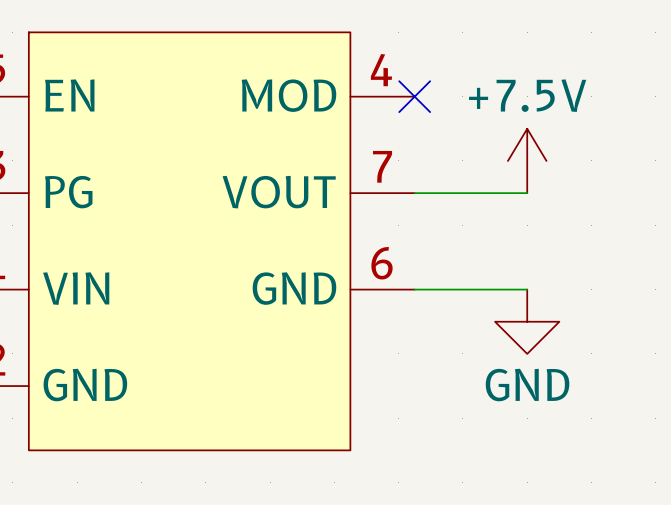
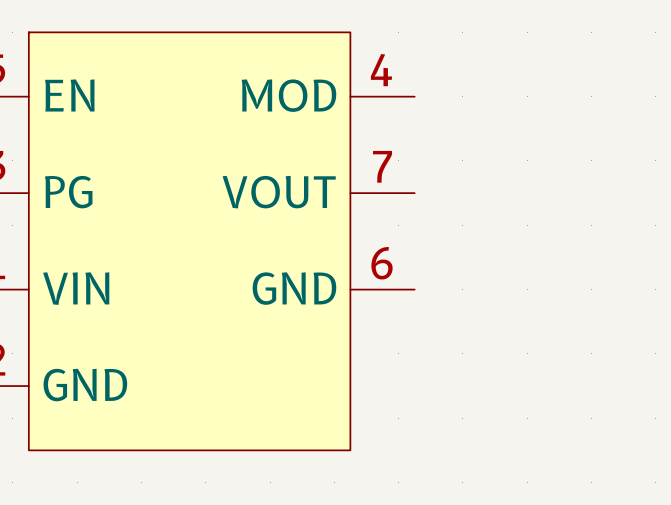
no-connect mark: (414, 96) -> none
power symbol: +7.5V (527, 160) -> none
wire: (414, 193) (527, 193) -> none
wire: (414, 289) (527, 289) -> none
power symbol: GND (527, 321) -> none

